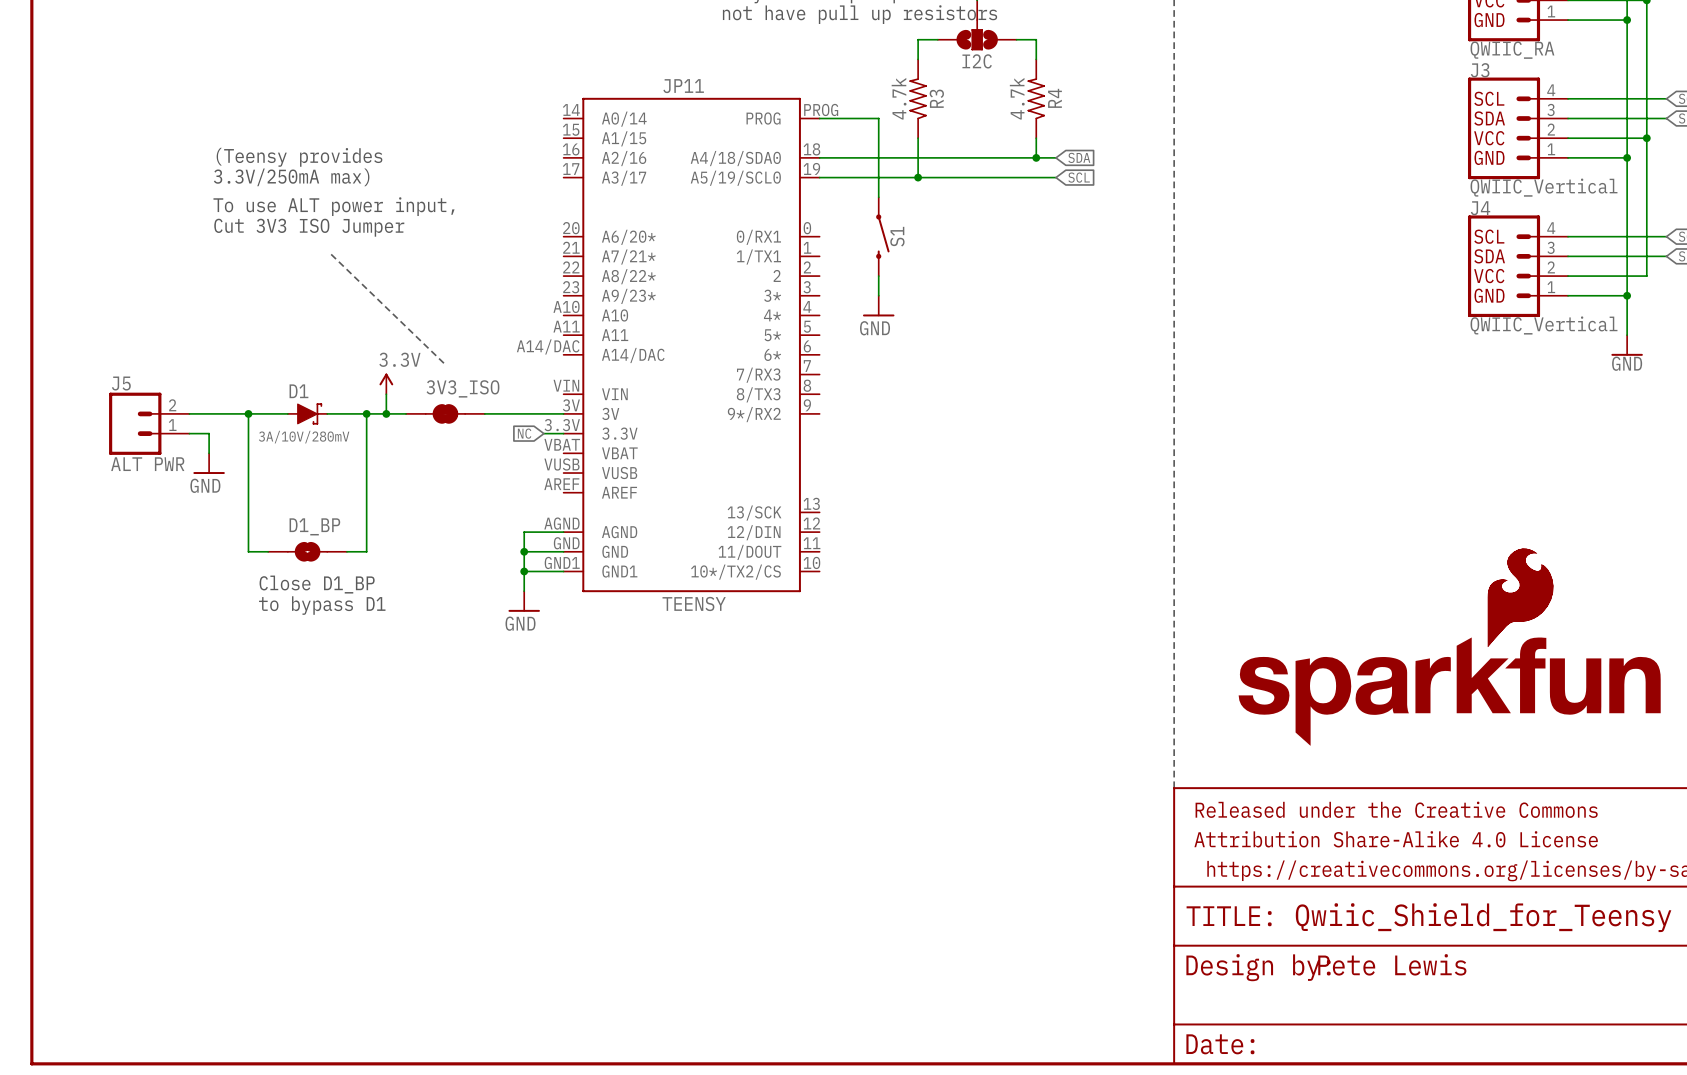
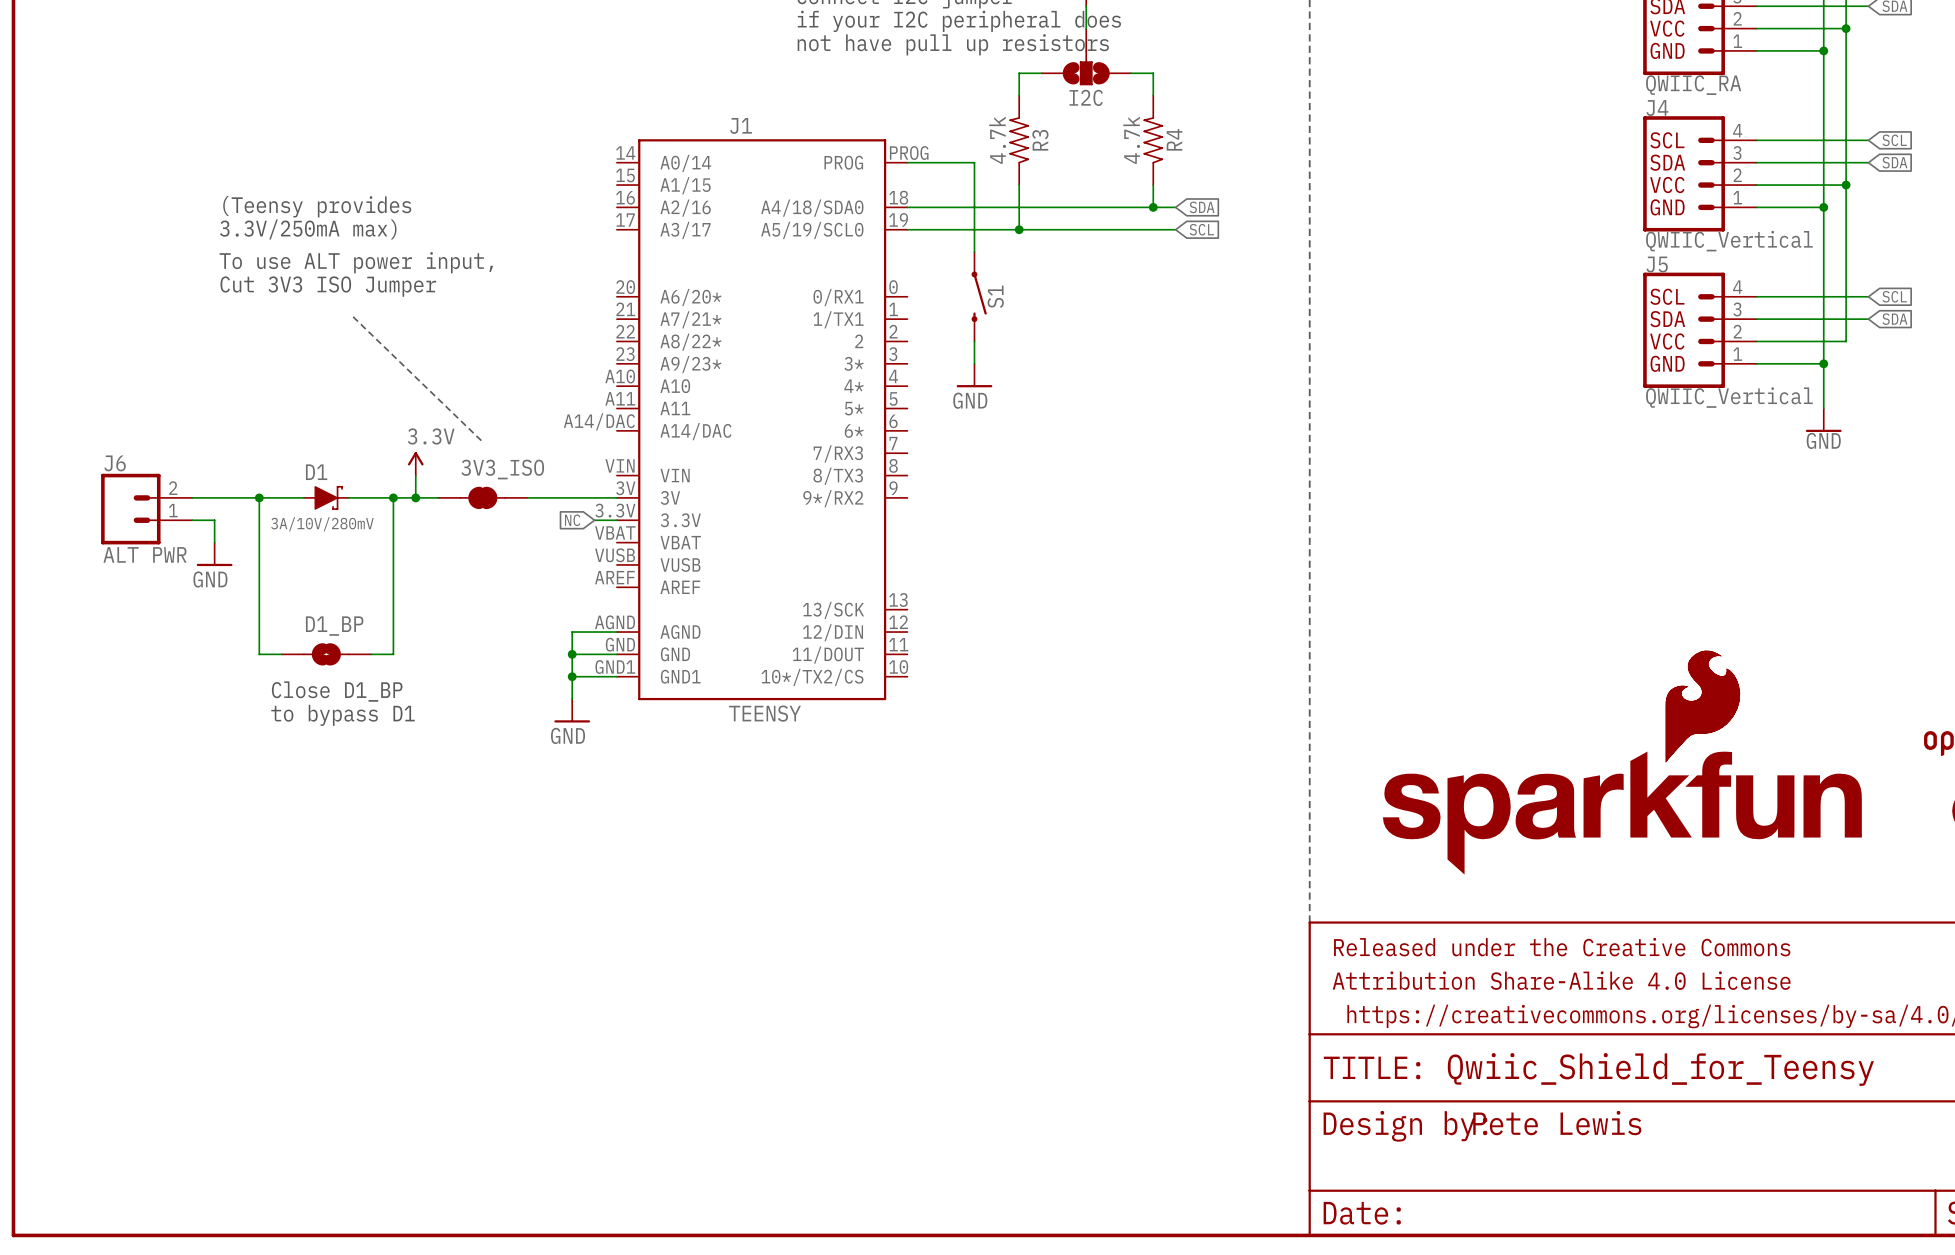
J3 name: J3 (1480, 70) -> J4 (1657, 108)
JP11 name: JP11 (683, 86) -> J1 (741, 125)
J4 name: J4 (1480, 208) -> J5 (1657, 264)
J5 name: J5 (121, 383) -> J6 (115, 463)

